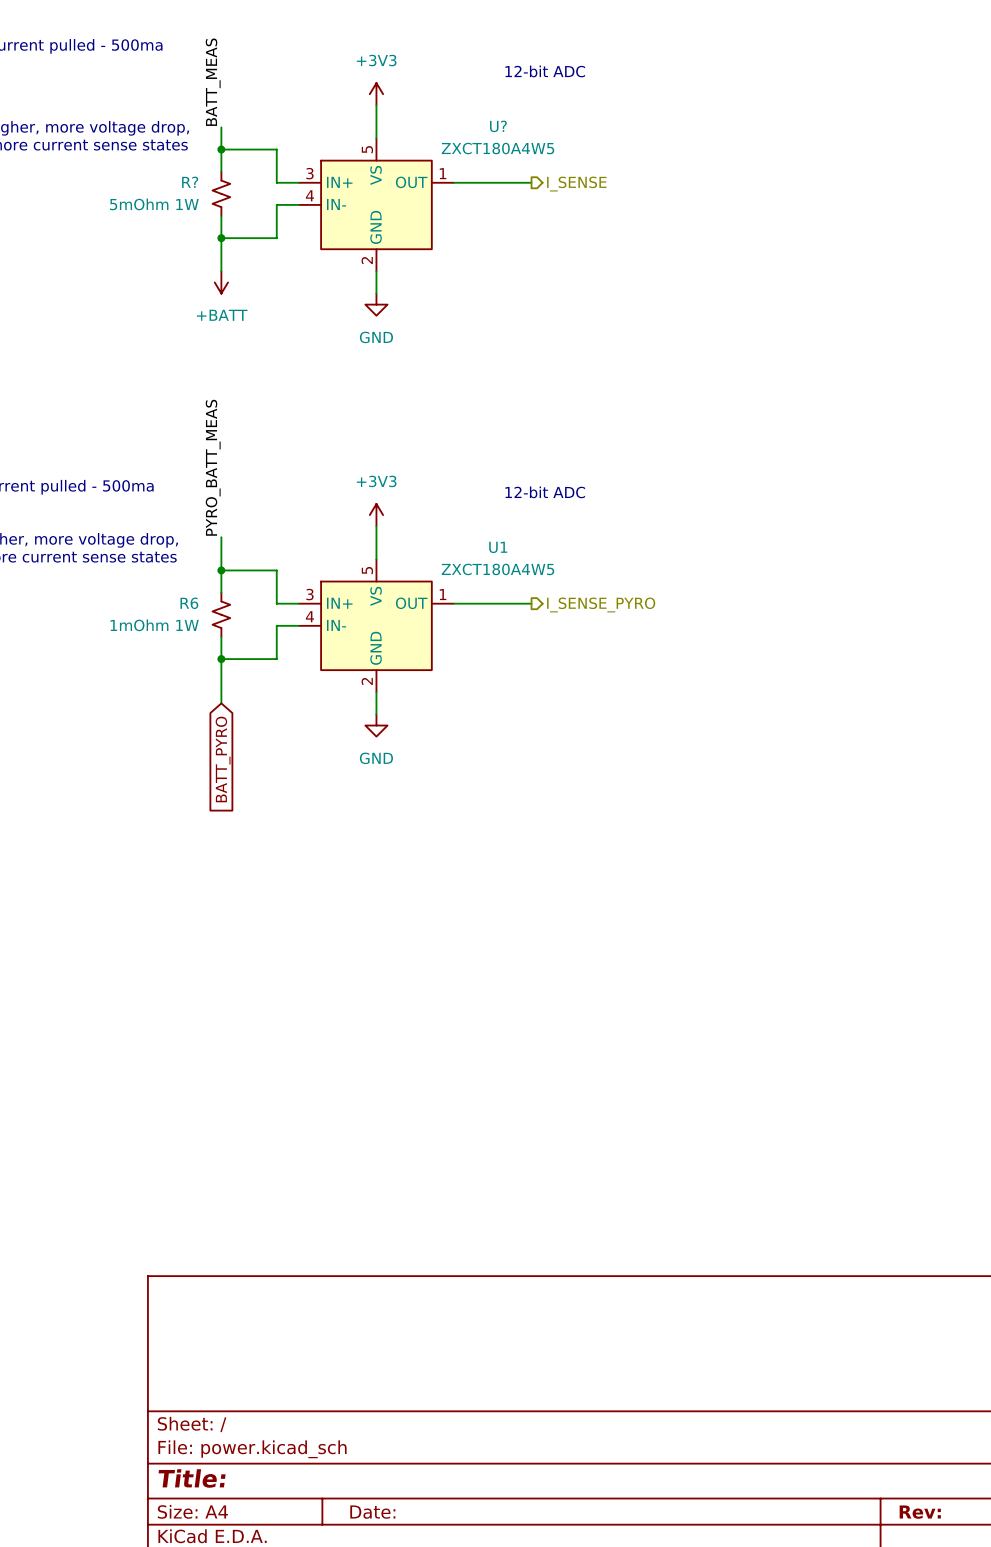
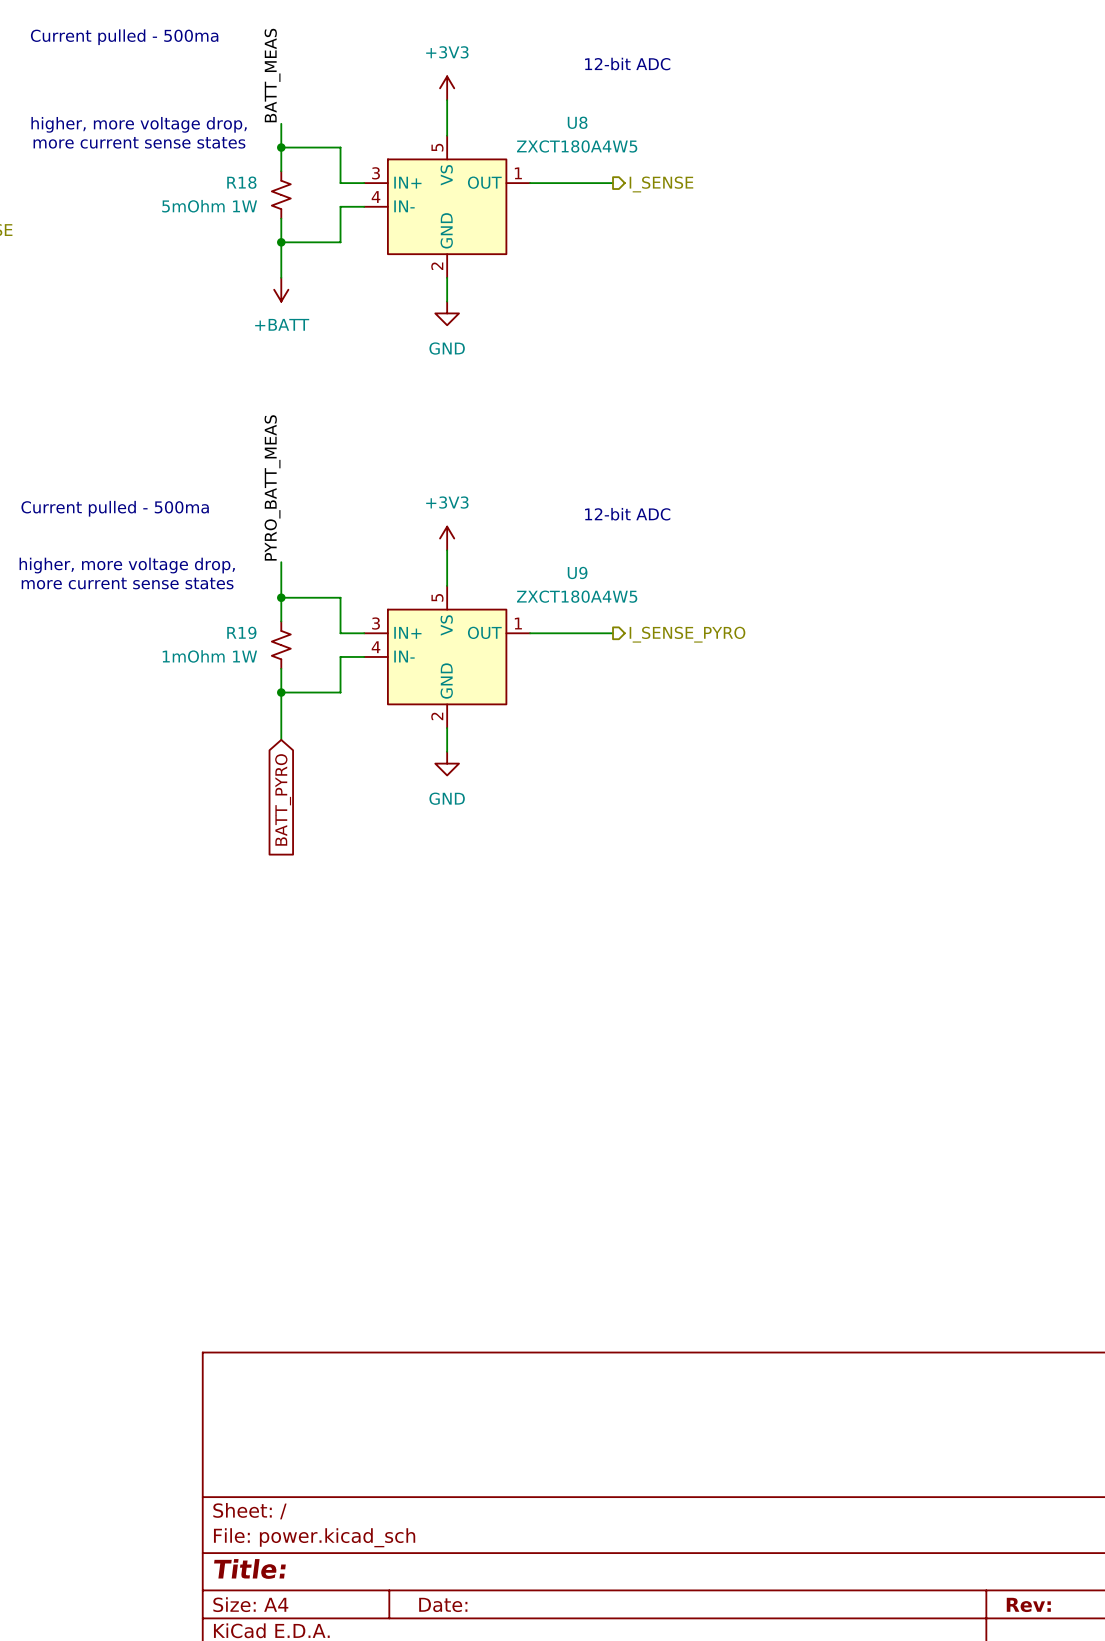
U? name: U? (498, 126) -> U8 (577, 122)
R? name: R? (190, 182) -> R18 (241, 182)
U1 name: U1 (498, 547) -> U9 (577, 572)
R6 name: R6 (189, 603) -> R19 (241, 632)

